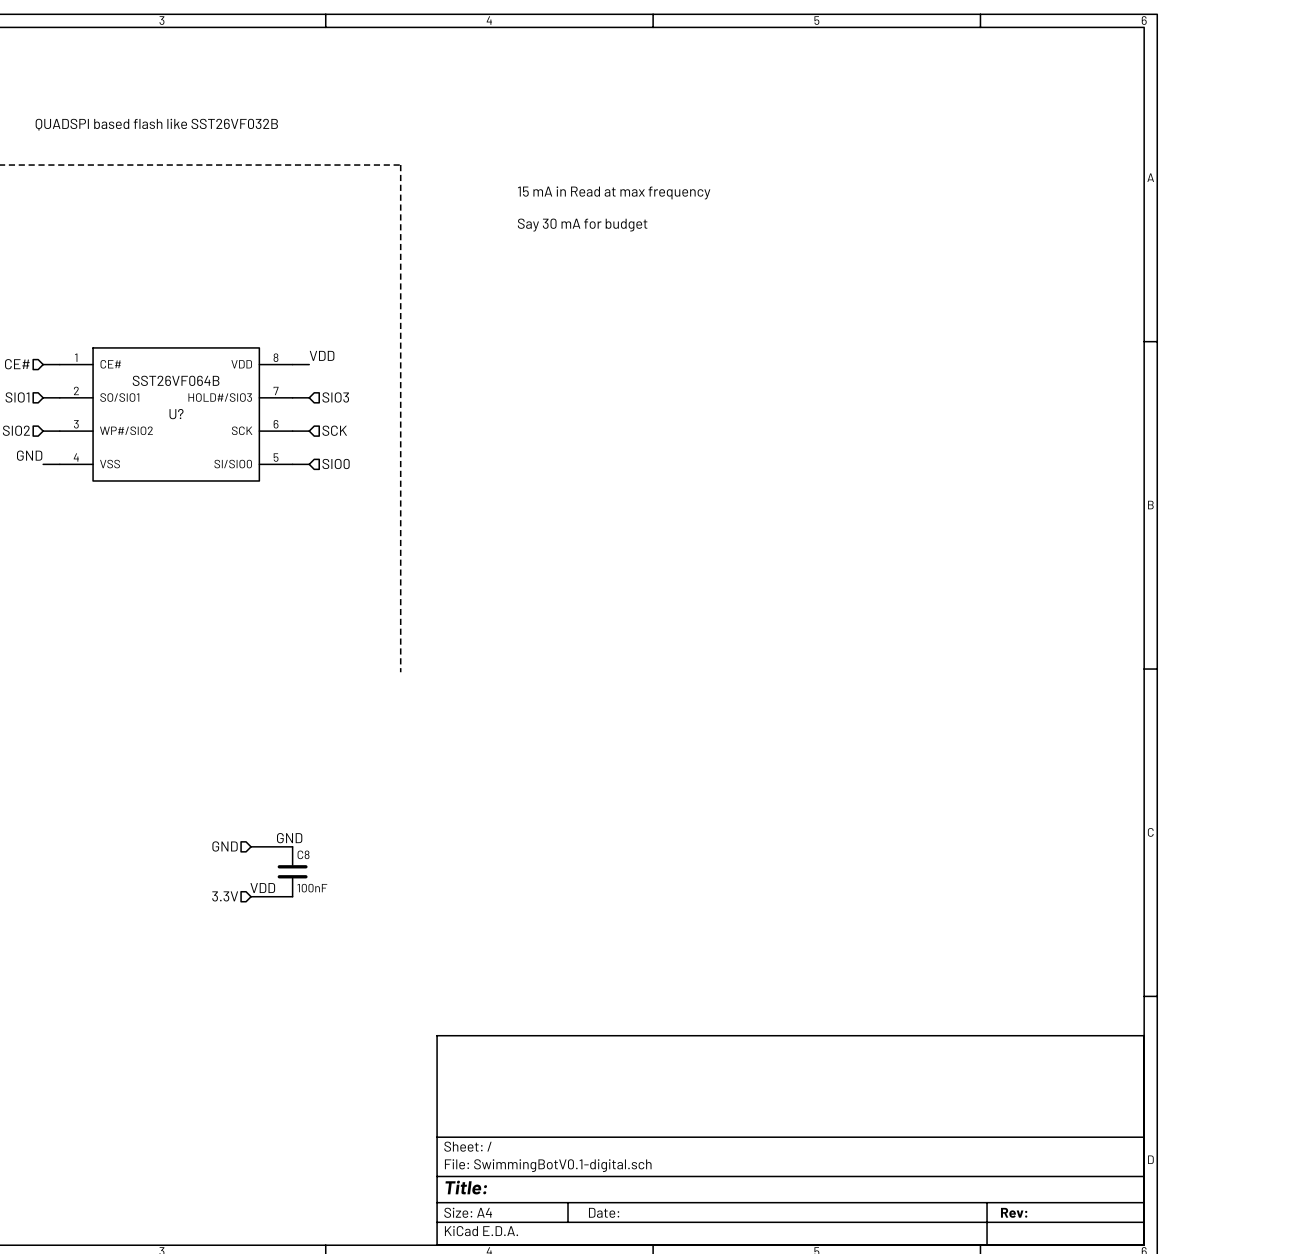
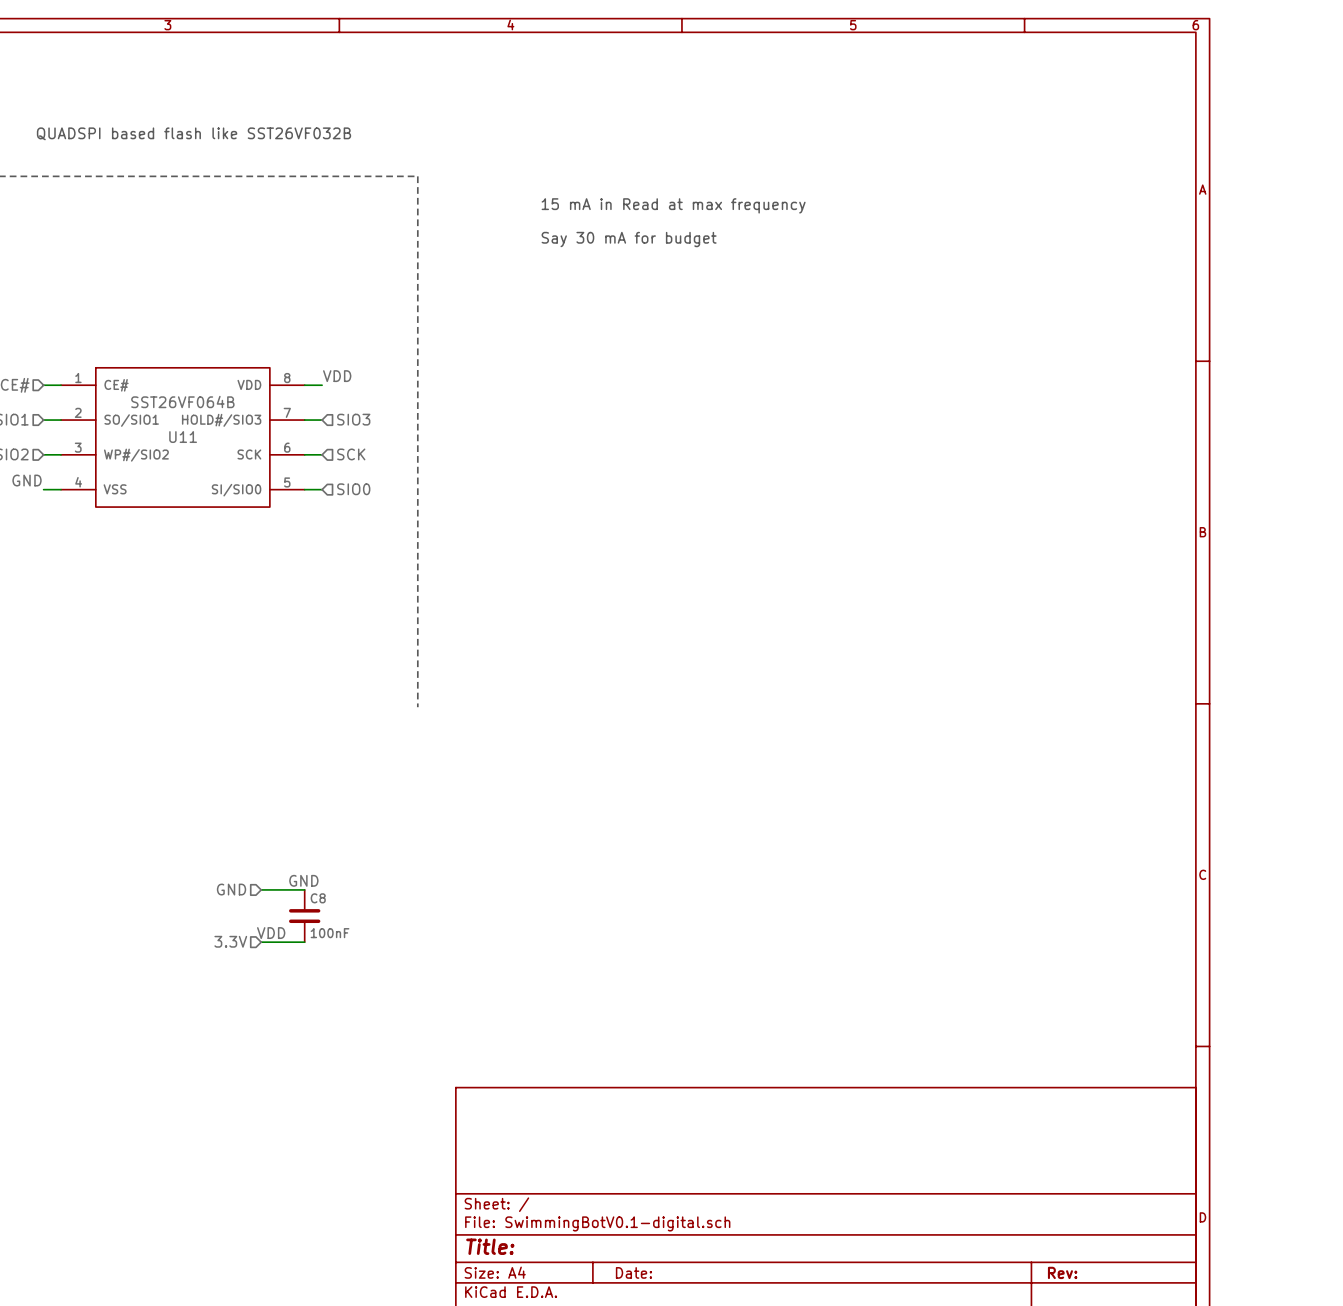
U? name: U? (176, 414) -> U11 (183, 437)

